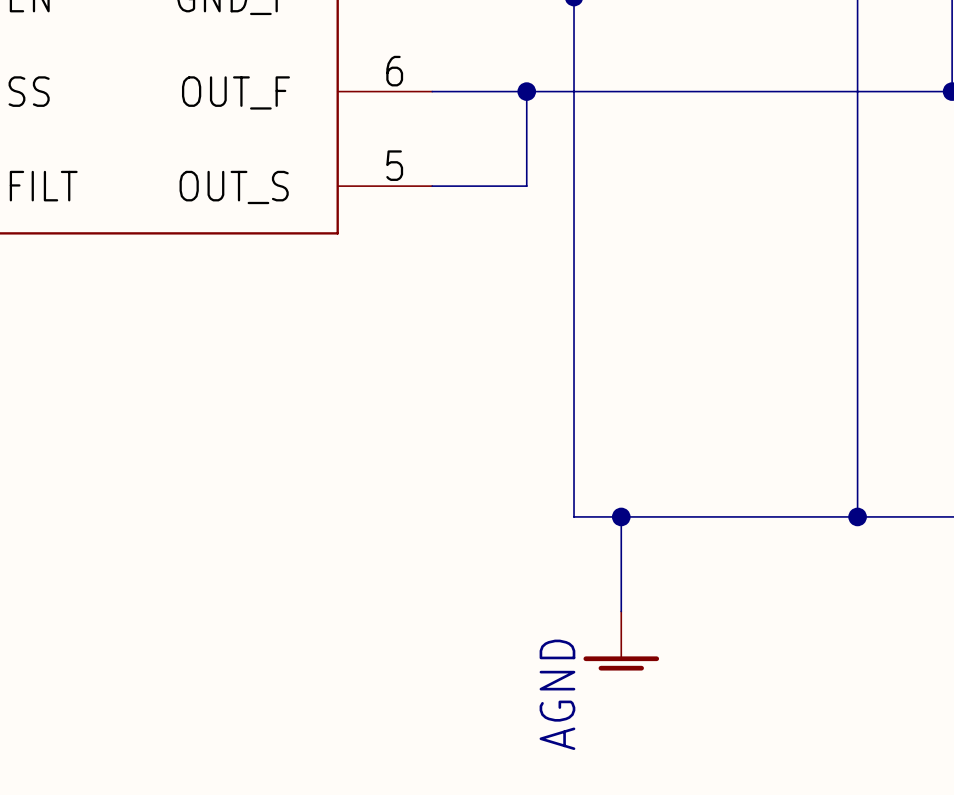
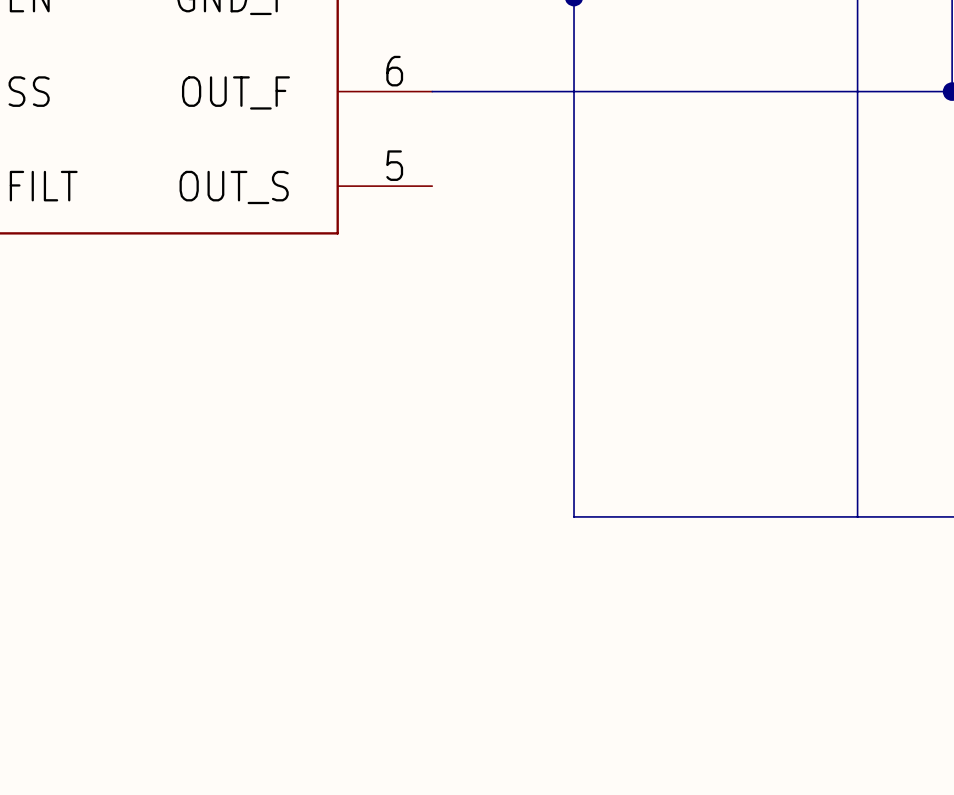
wire: (526, 91) (526, 186) (432, 186) -> none
junction: (526, 91) -> none
wire: (621, 516) (621, 611) -> none
junction: (621, 516) -> none
junction: (857, 516) -> none
power symbol: AGND (621, 641) -> none

